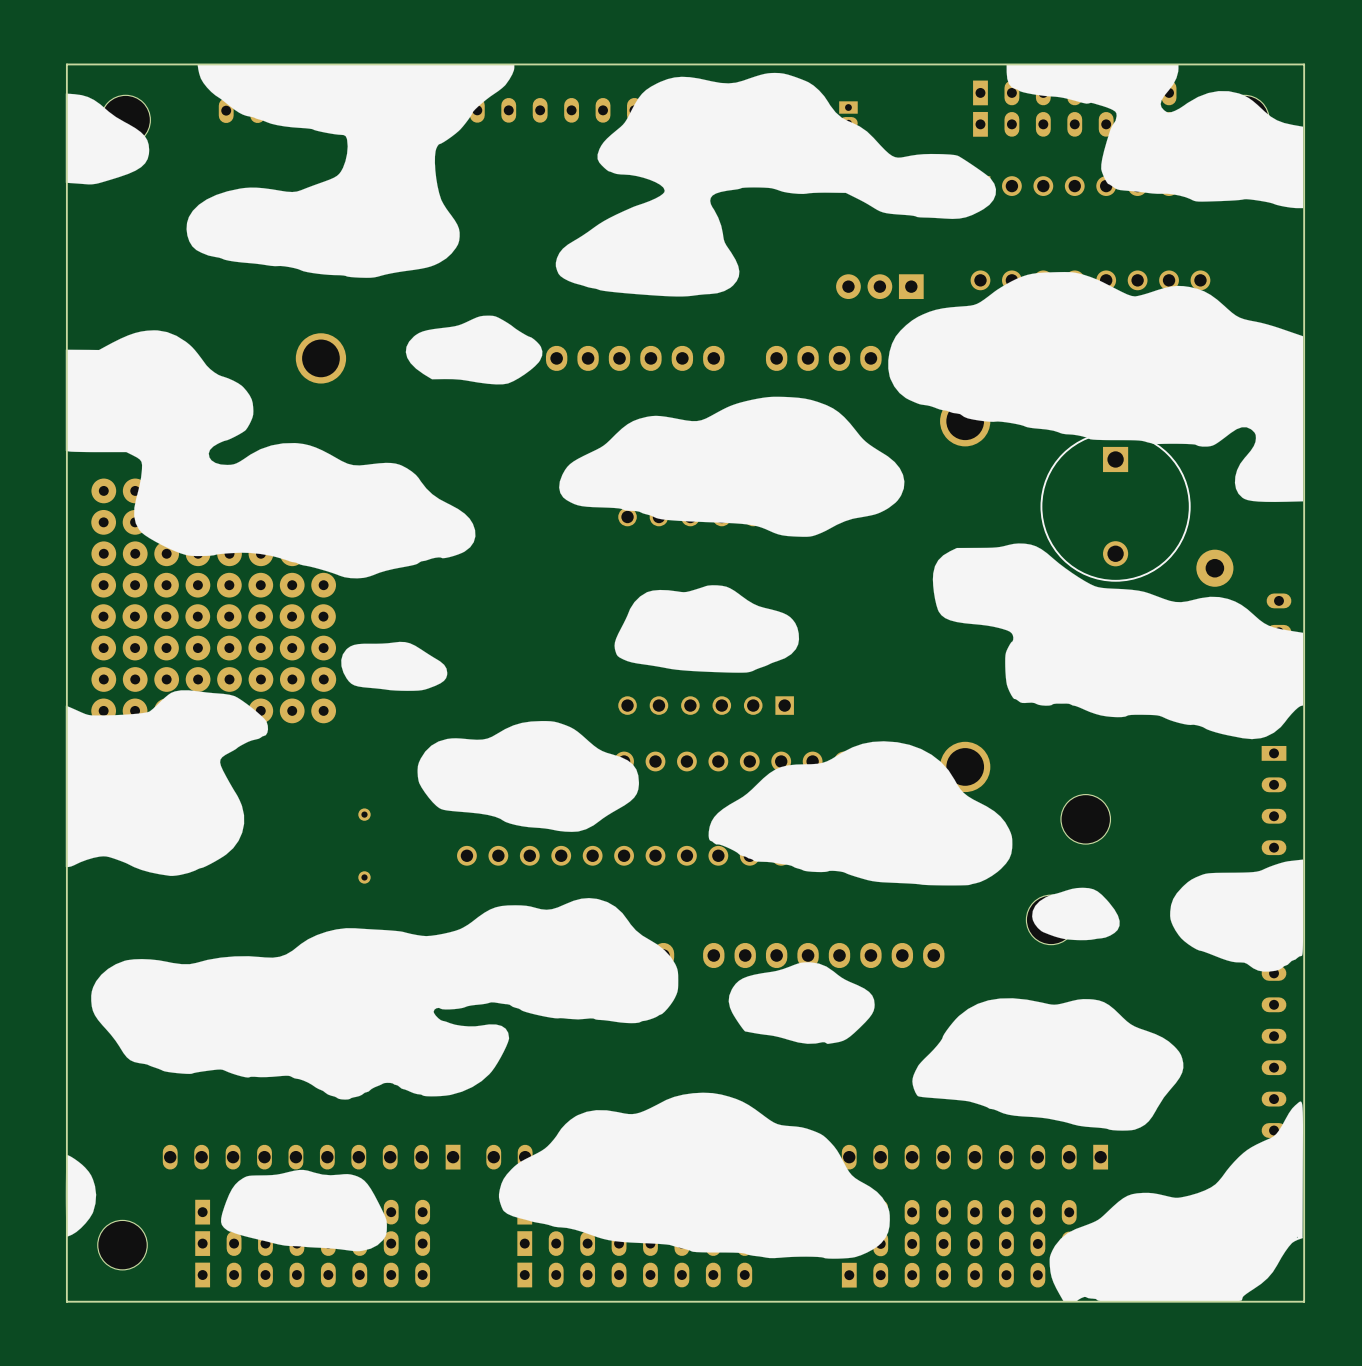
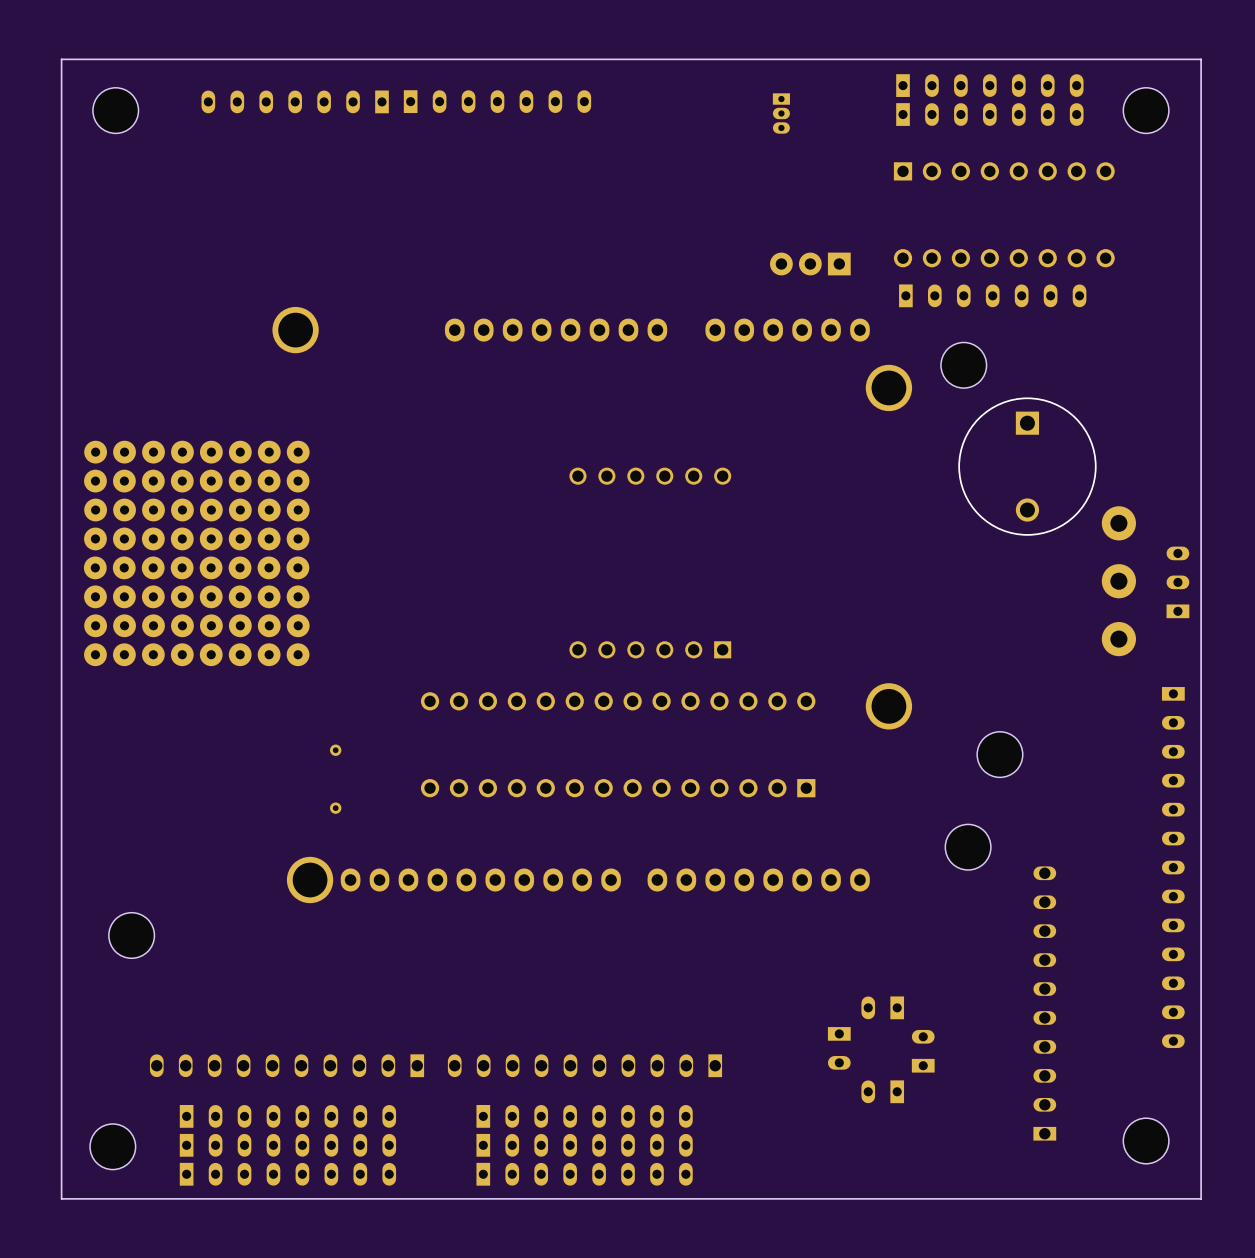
drawing: [65, 64, 1304, 1302] -> none
part: none -> (882, 1007)
part: none -> (839, 1048)
part: none -> (923, 1051)
part rotation: 0° (959, 1157) -> 90° clockwise (1044, 1003)
part position: (959, 1157) -> (1044, 1003)
part: none -> (882, 1091)
part: (959, 1212) -> none
part: (959, 1243) -> none
part: (959, 1275) -> none

